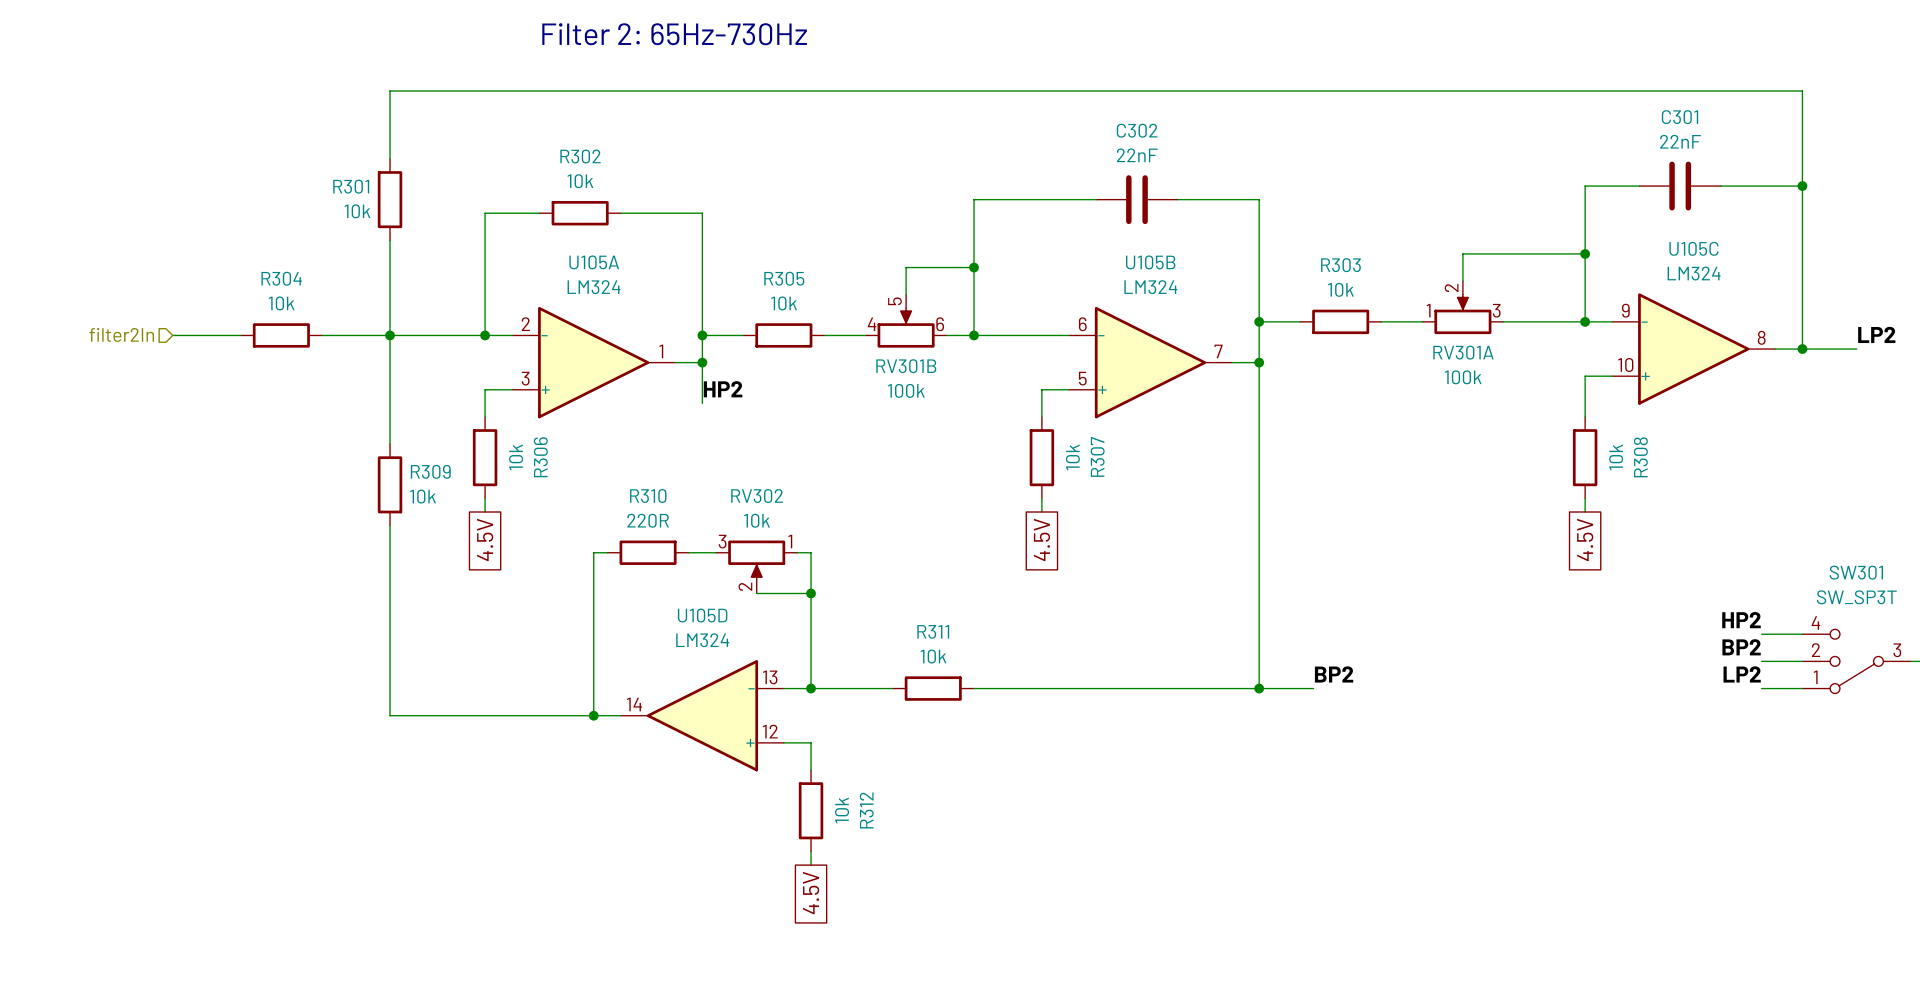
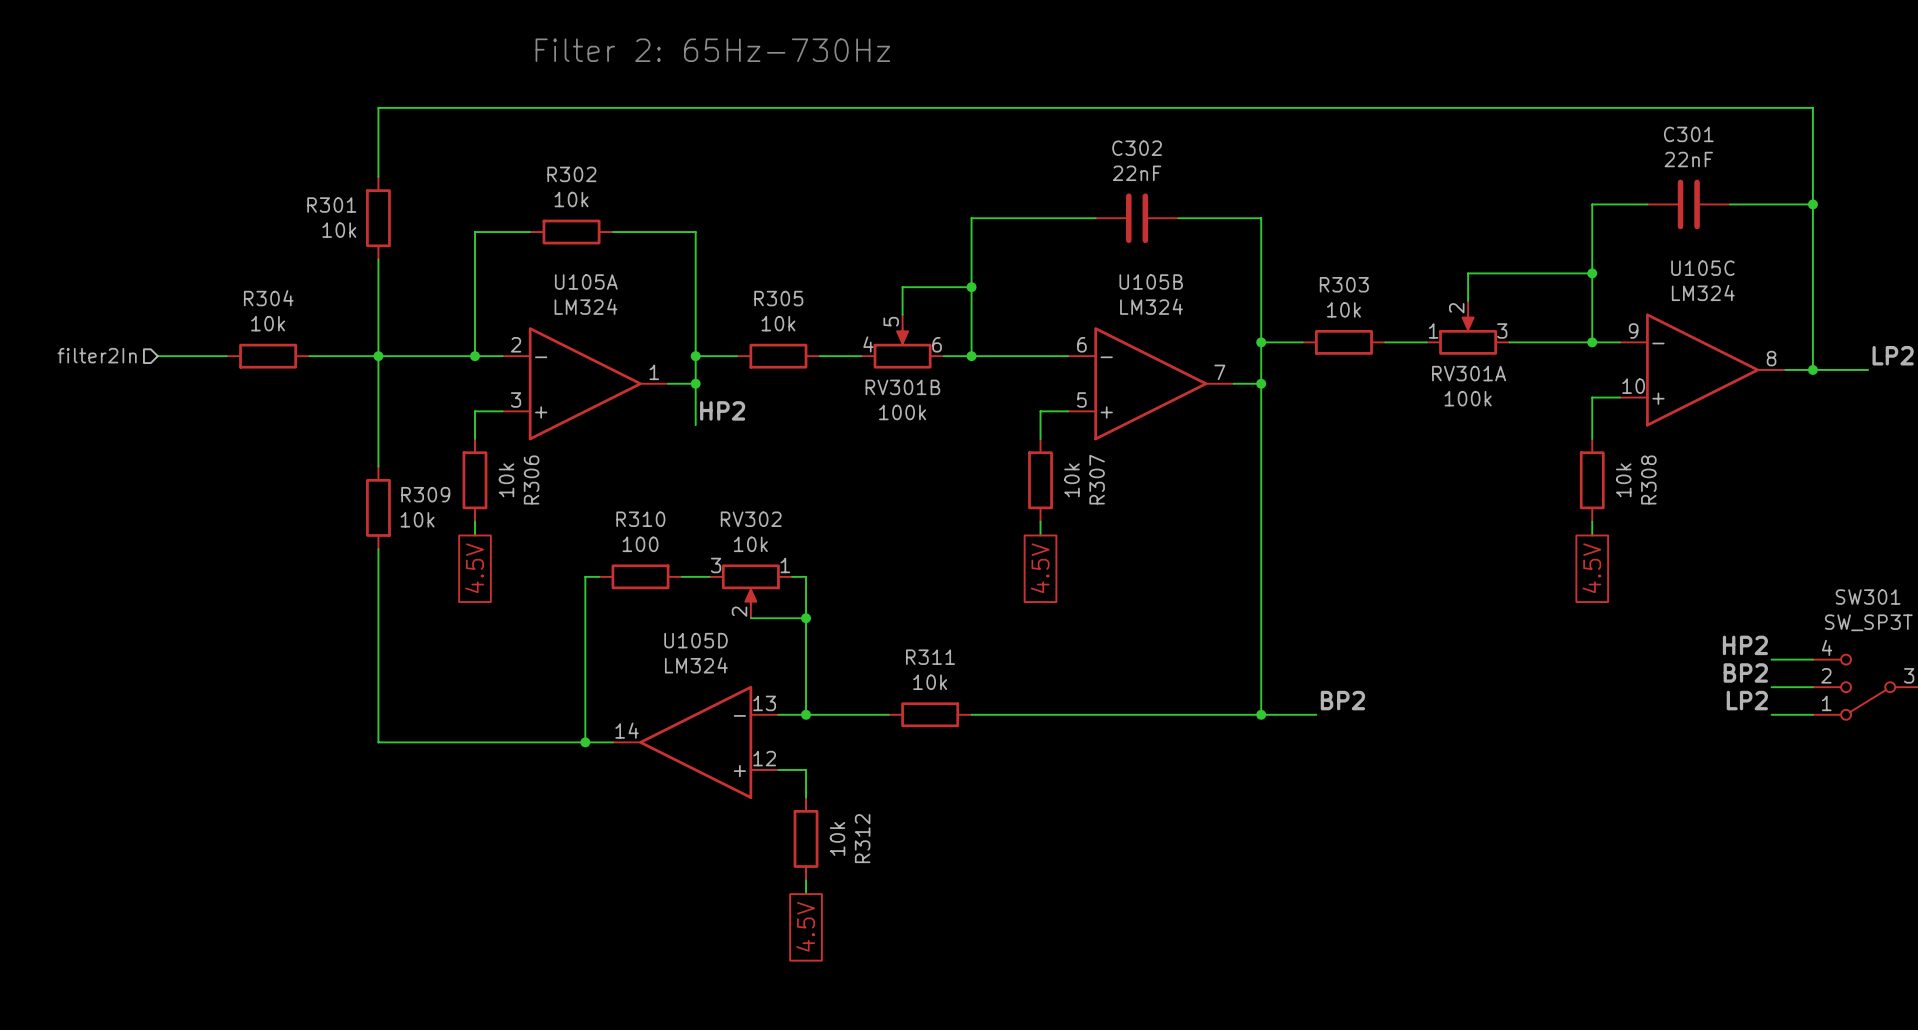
R310 value: 220R (648, 520) -> 100 (640, 544)

